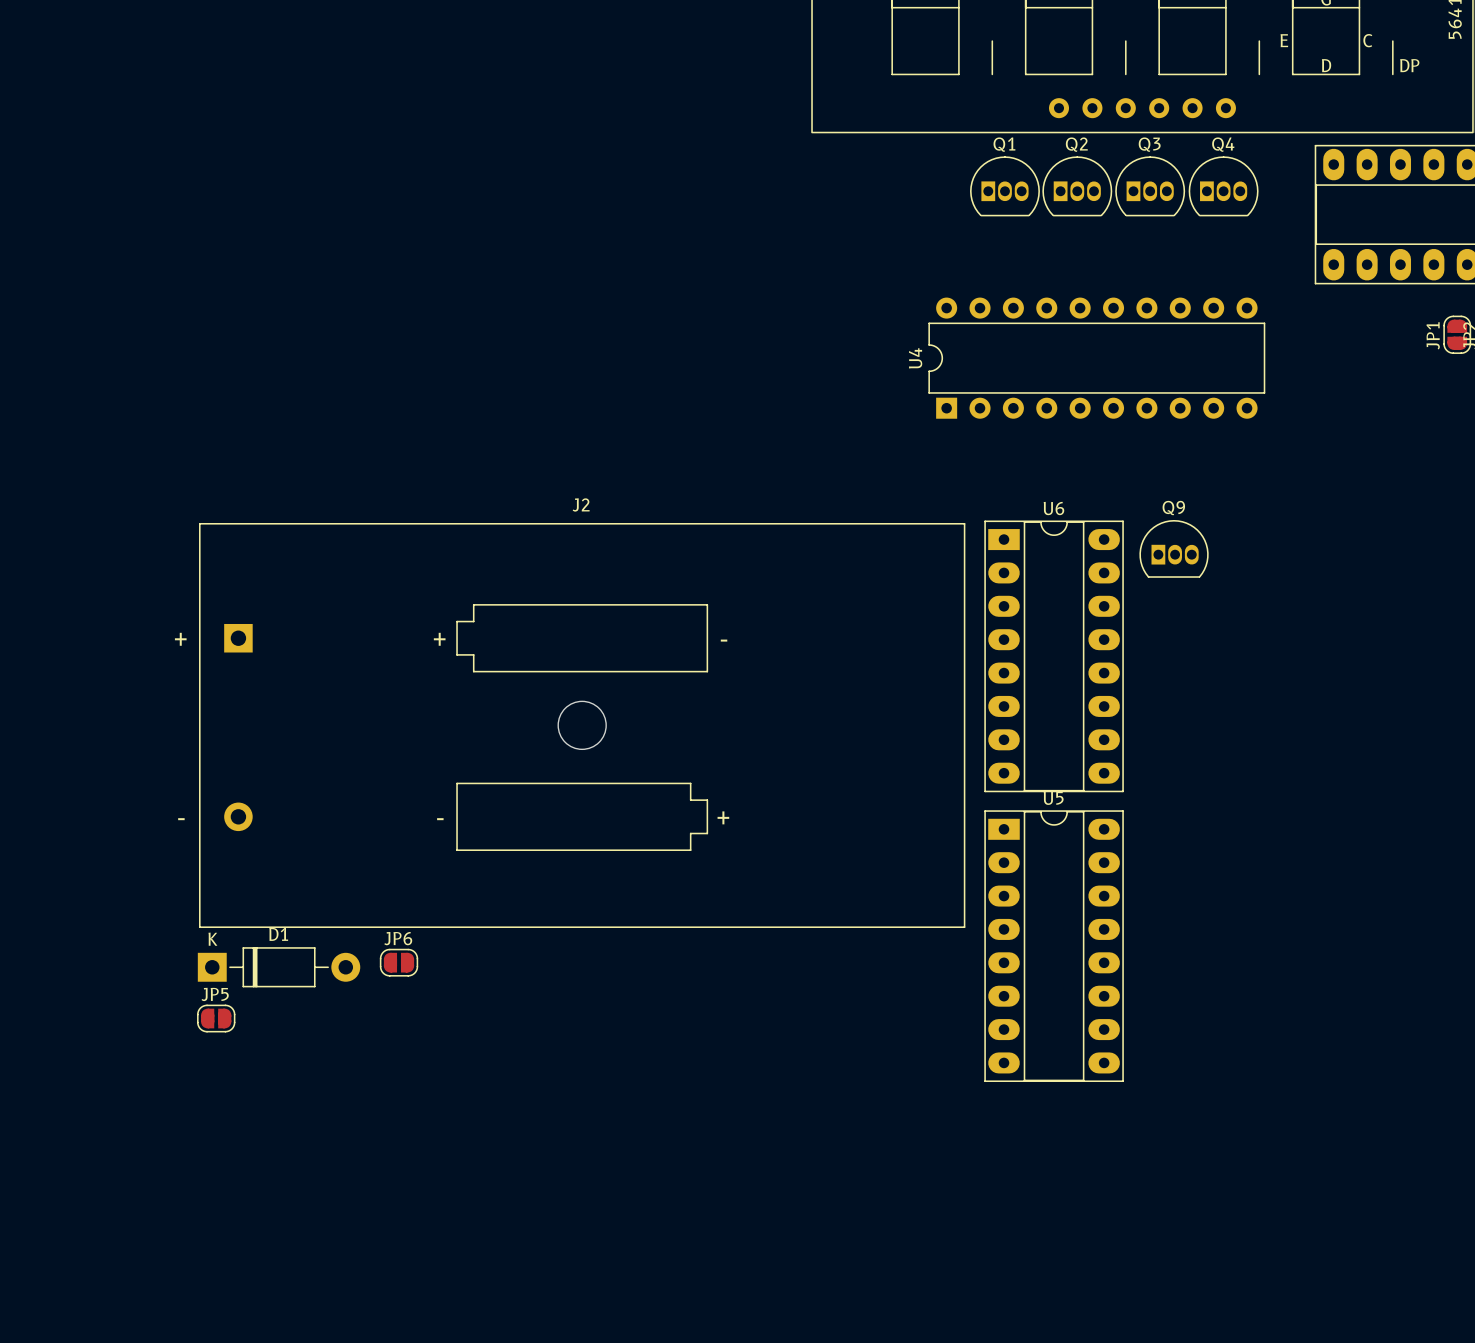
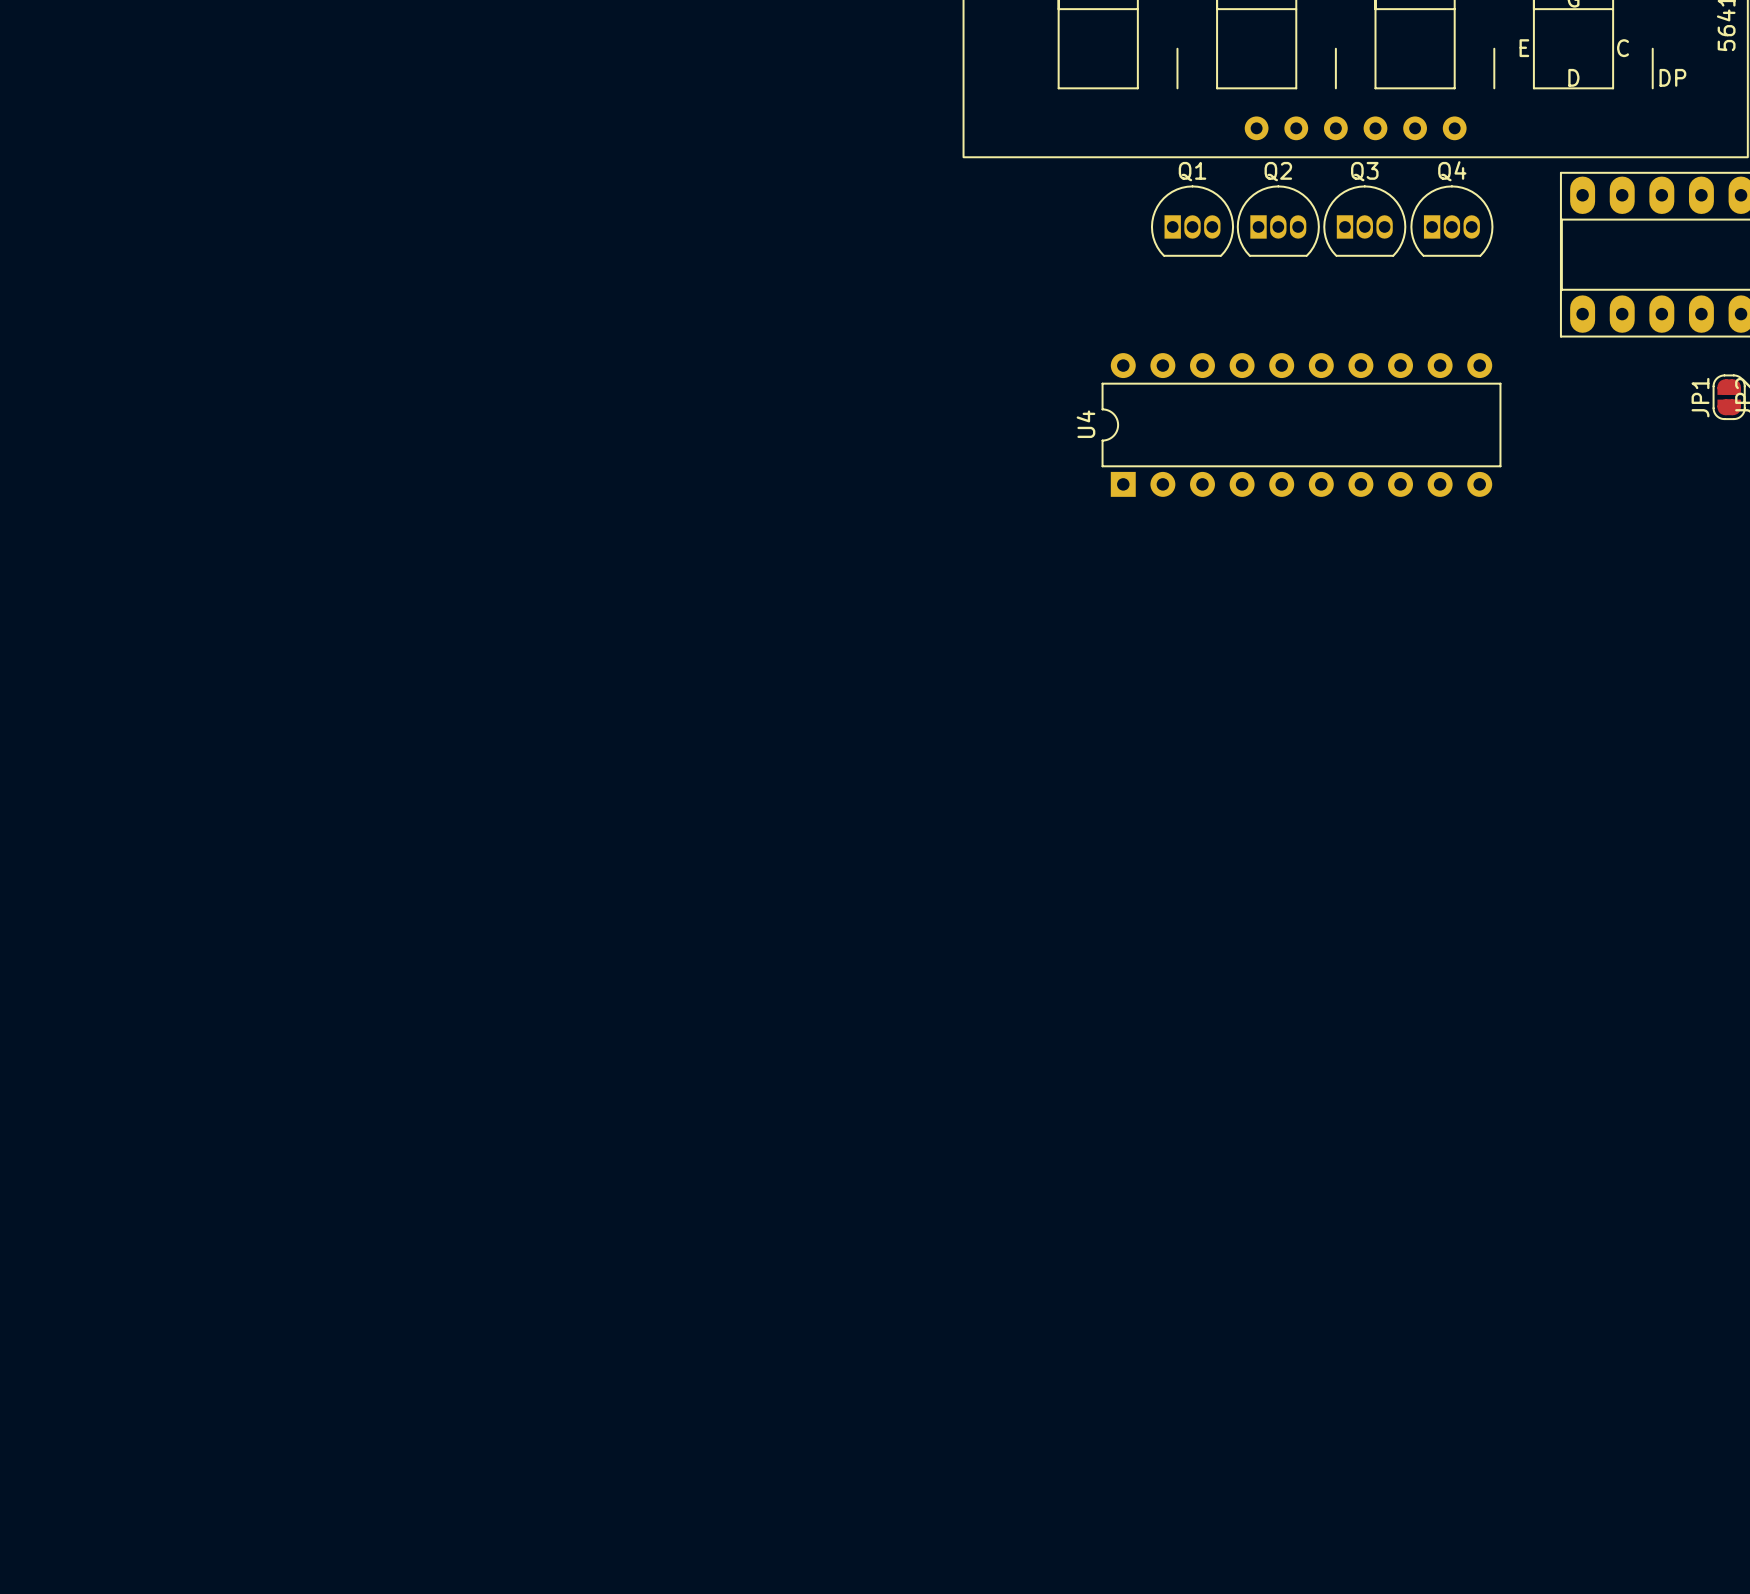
Q9: (1174, 548) -> none
U6: (1054, 656) -> none
J2: (582, 725) -> none
U5: (1054, 946) -> none
JP6: (399, 962) -> none
D1: (279, 967) -> none
JP5: (216, 1018) -> none

